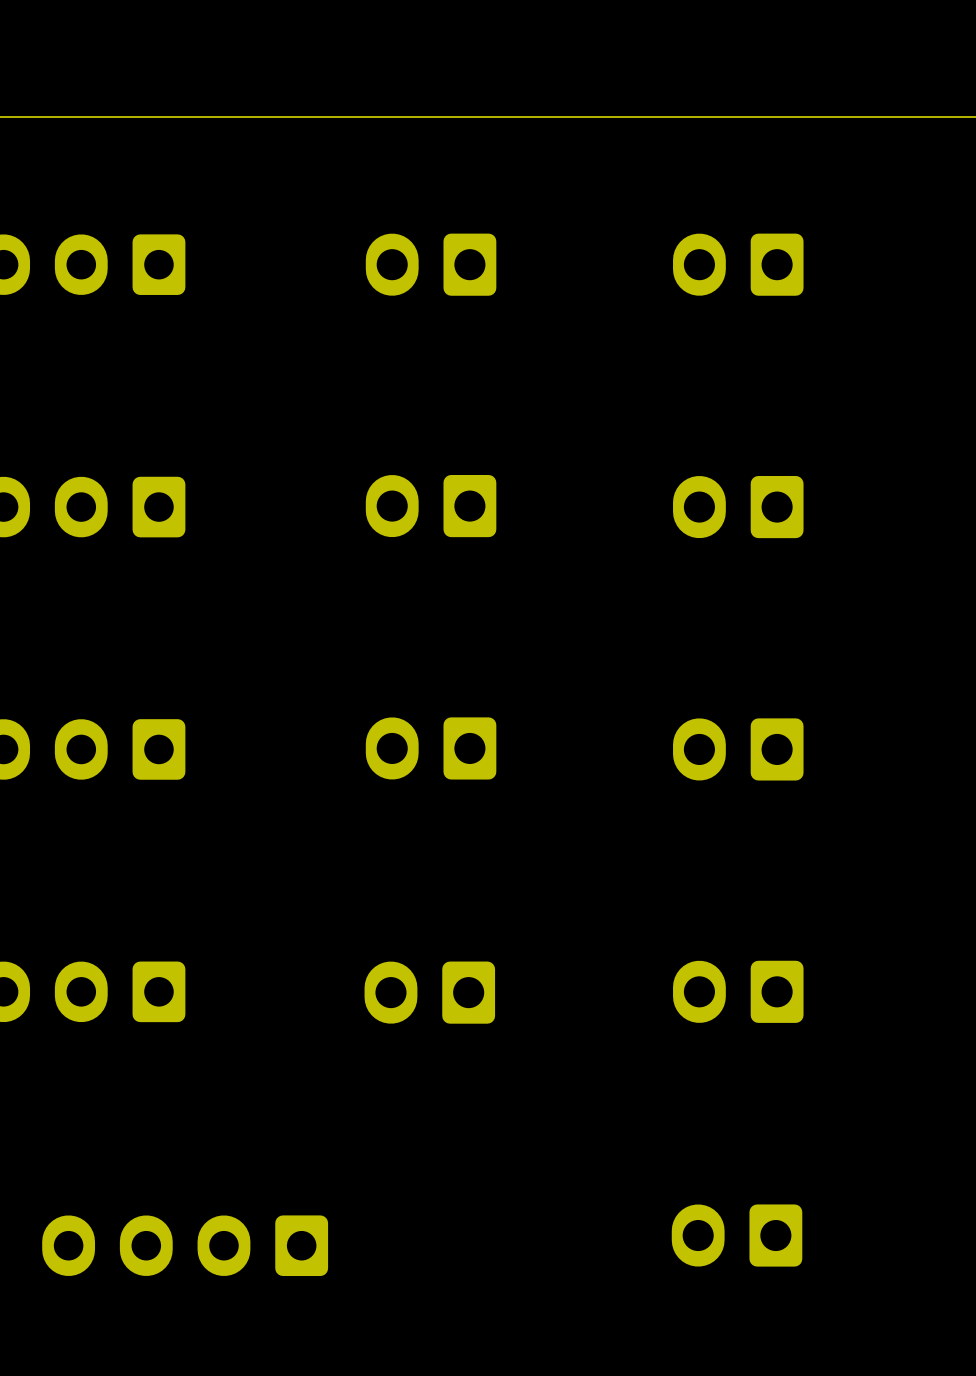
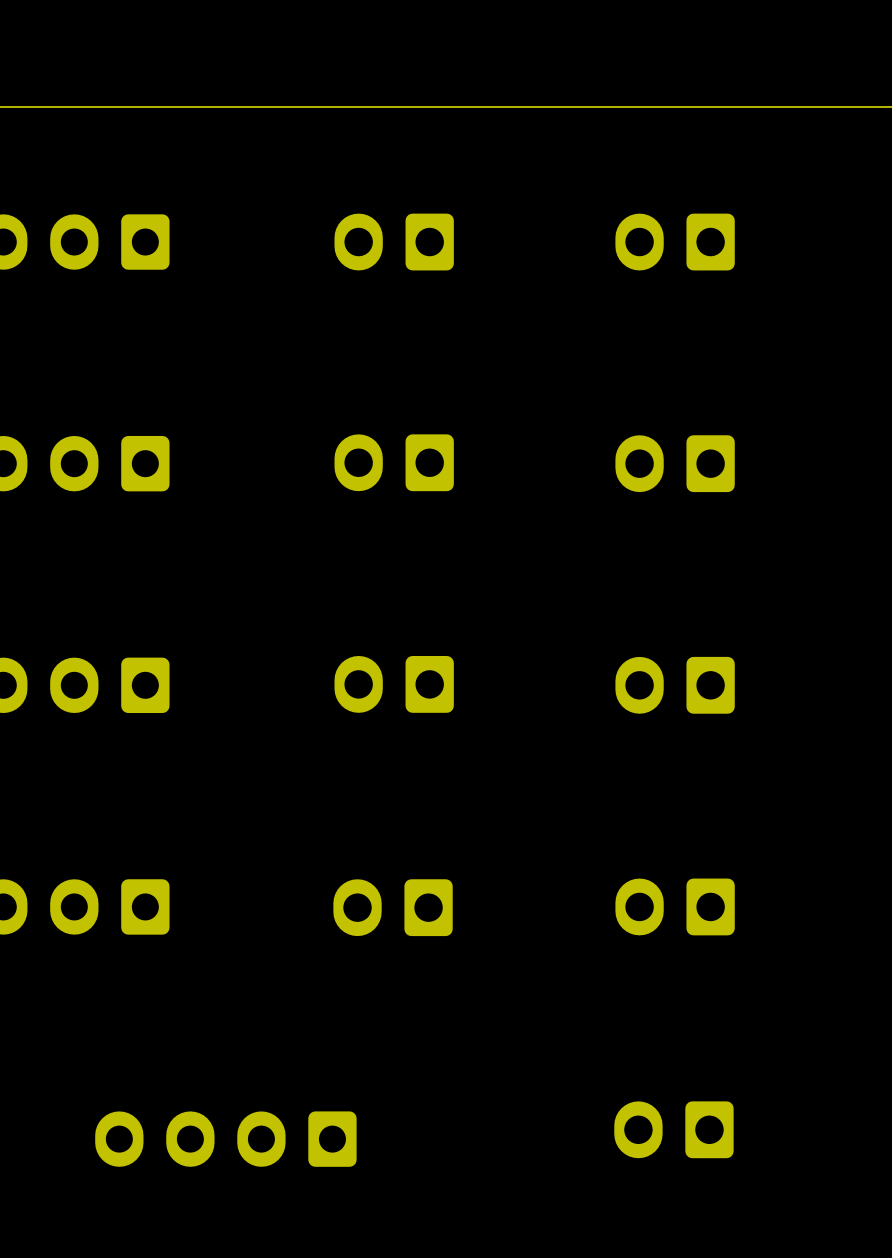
part position: (185, 1245) -> (225, 1139)

